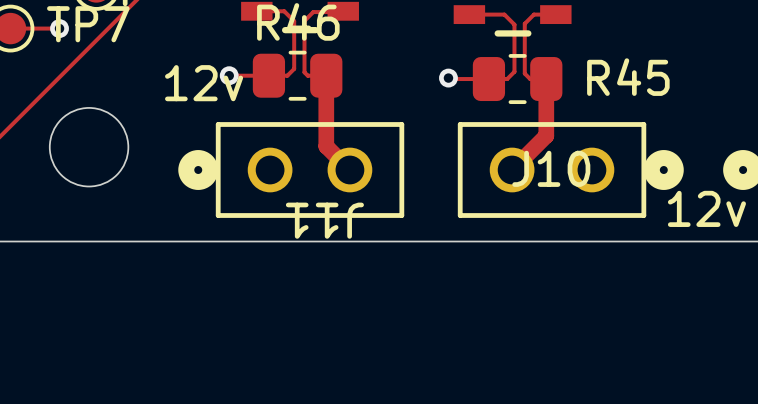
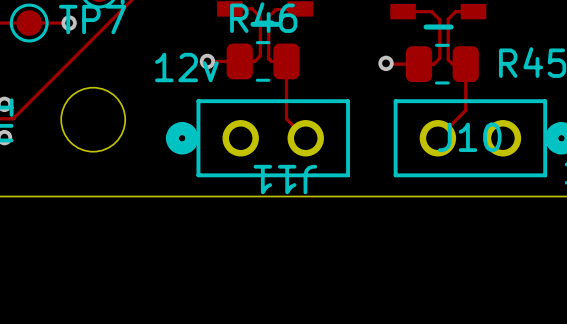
track width: thick (326, 75) (326, 146) (349, 170) -> thin (286, 61) (286, 118) (305, 138)
track width: thick (546, 79) (546, 135) (512, 170) -> thin (465, 64) (465, 110) (437, 138)

